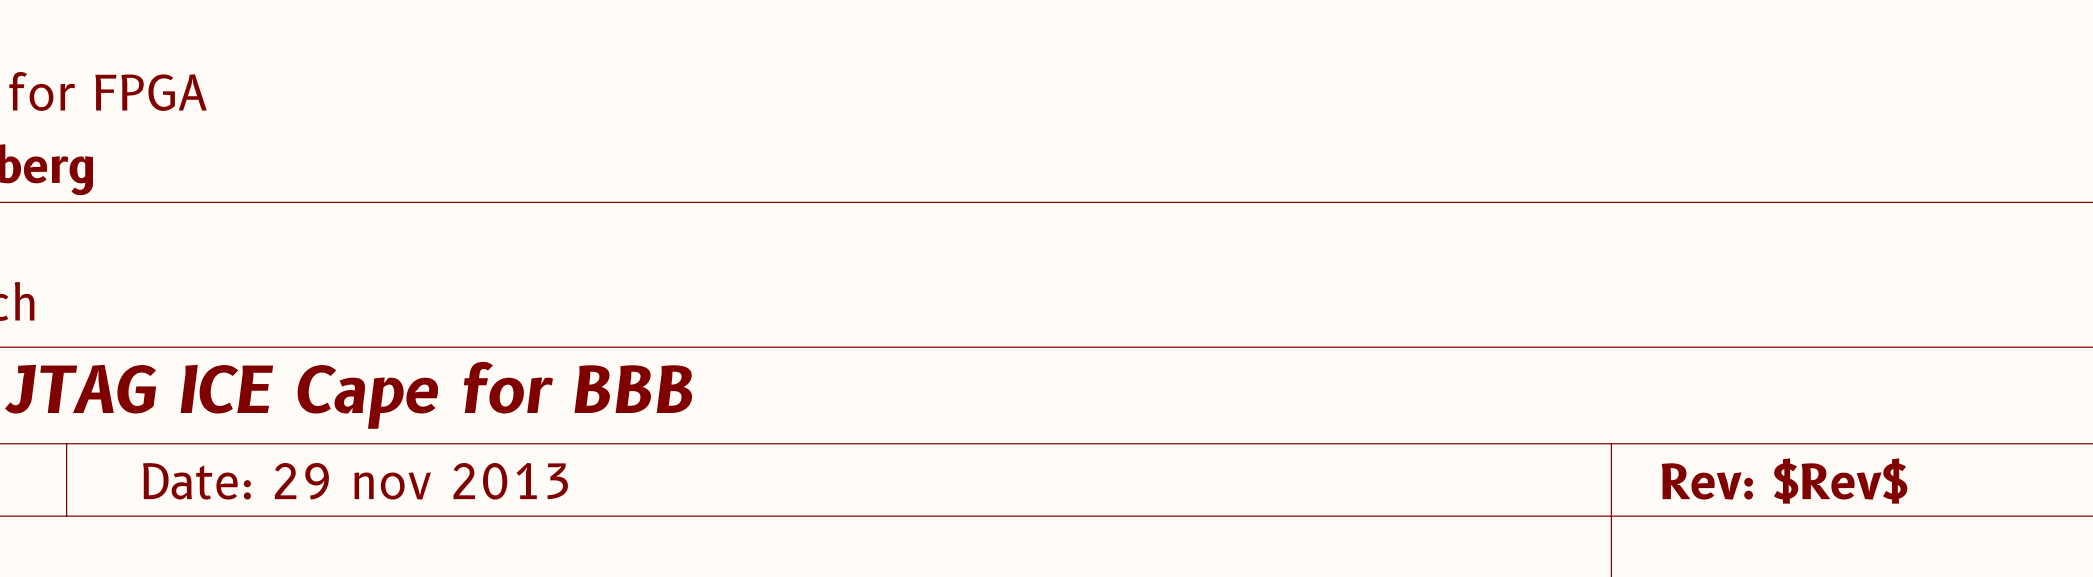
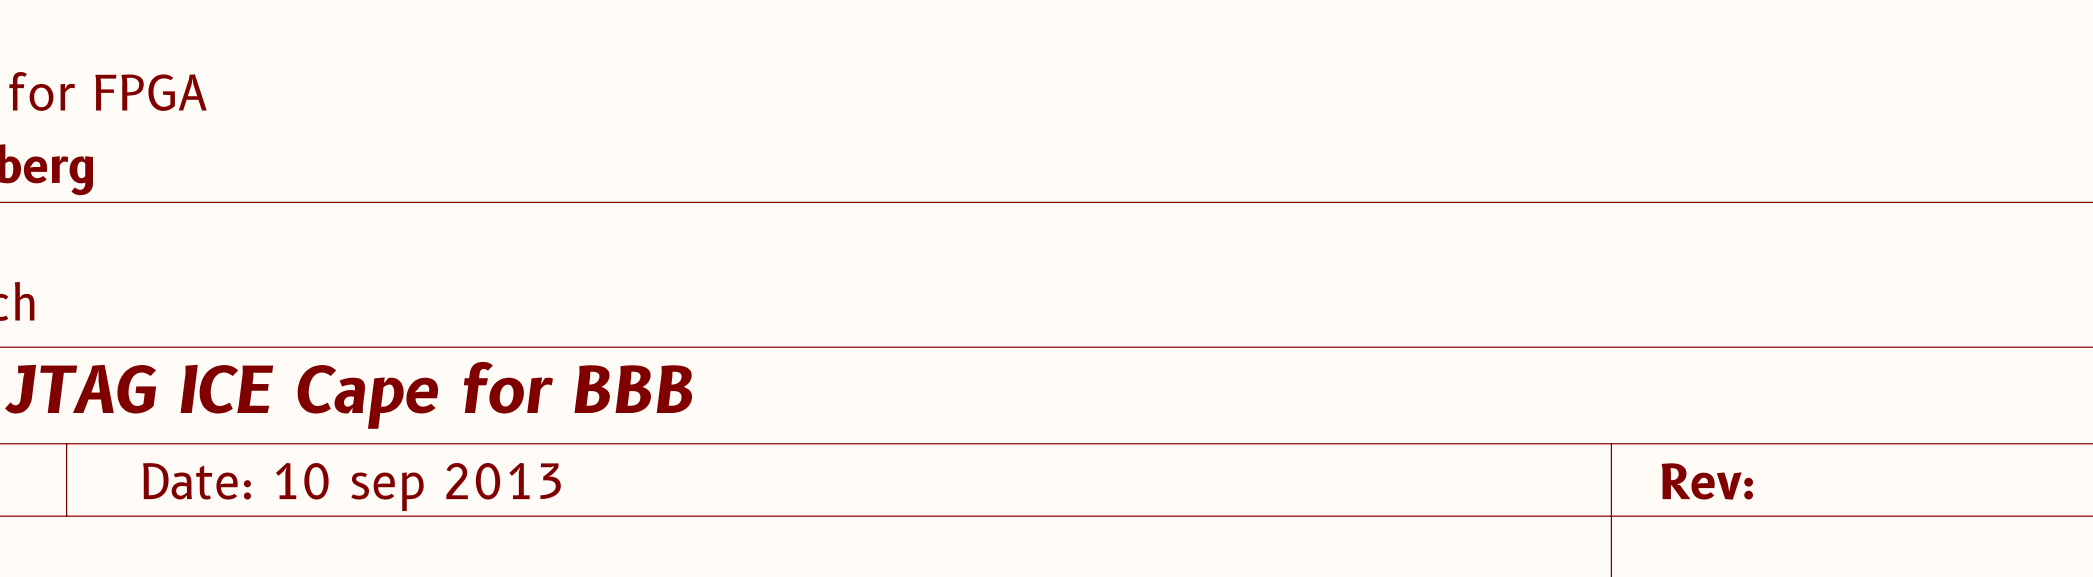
title block: Date: 29 nov 2013 (355, 481) -> Date: 10 sep 2013 (351, 486)
title block: Rev: $Rev$ (1784, 481) -> Rev: (1707, 481)

